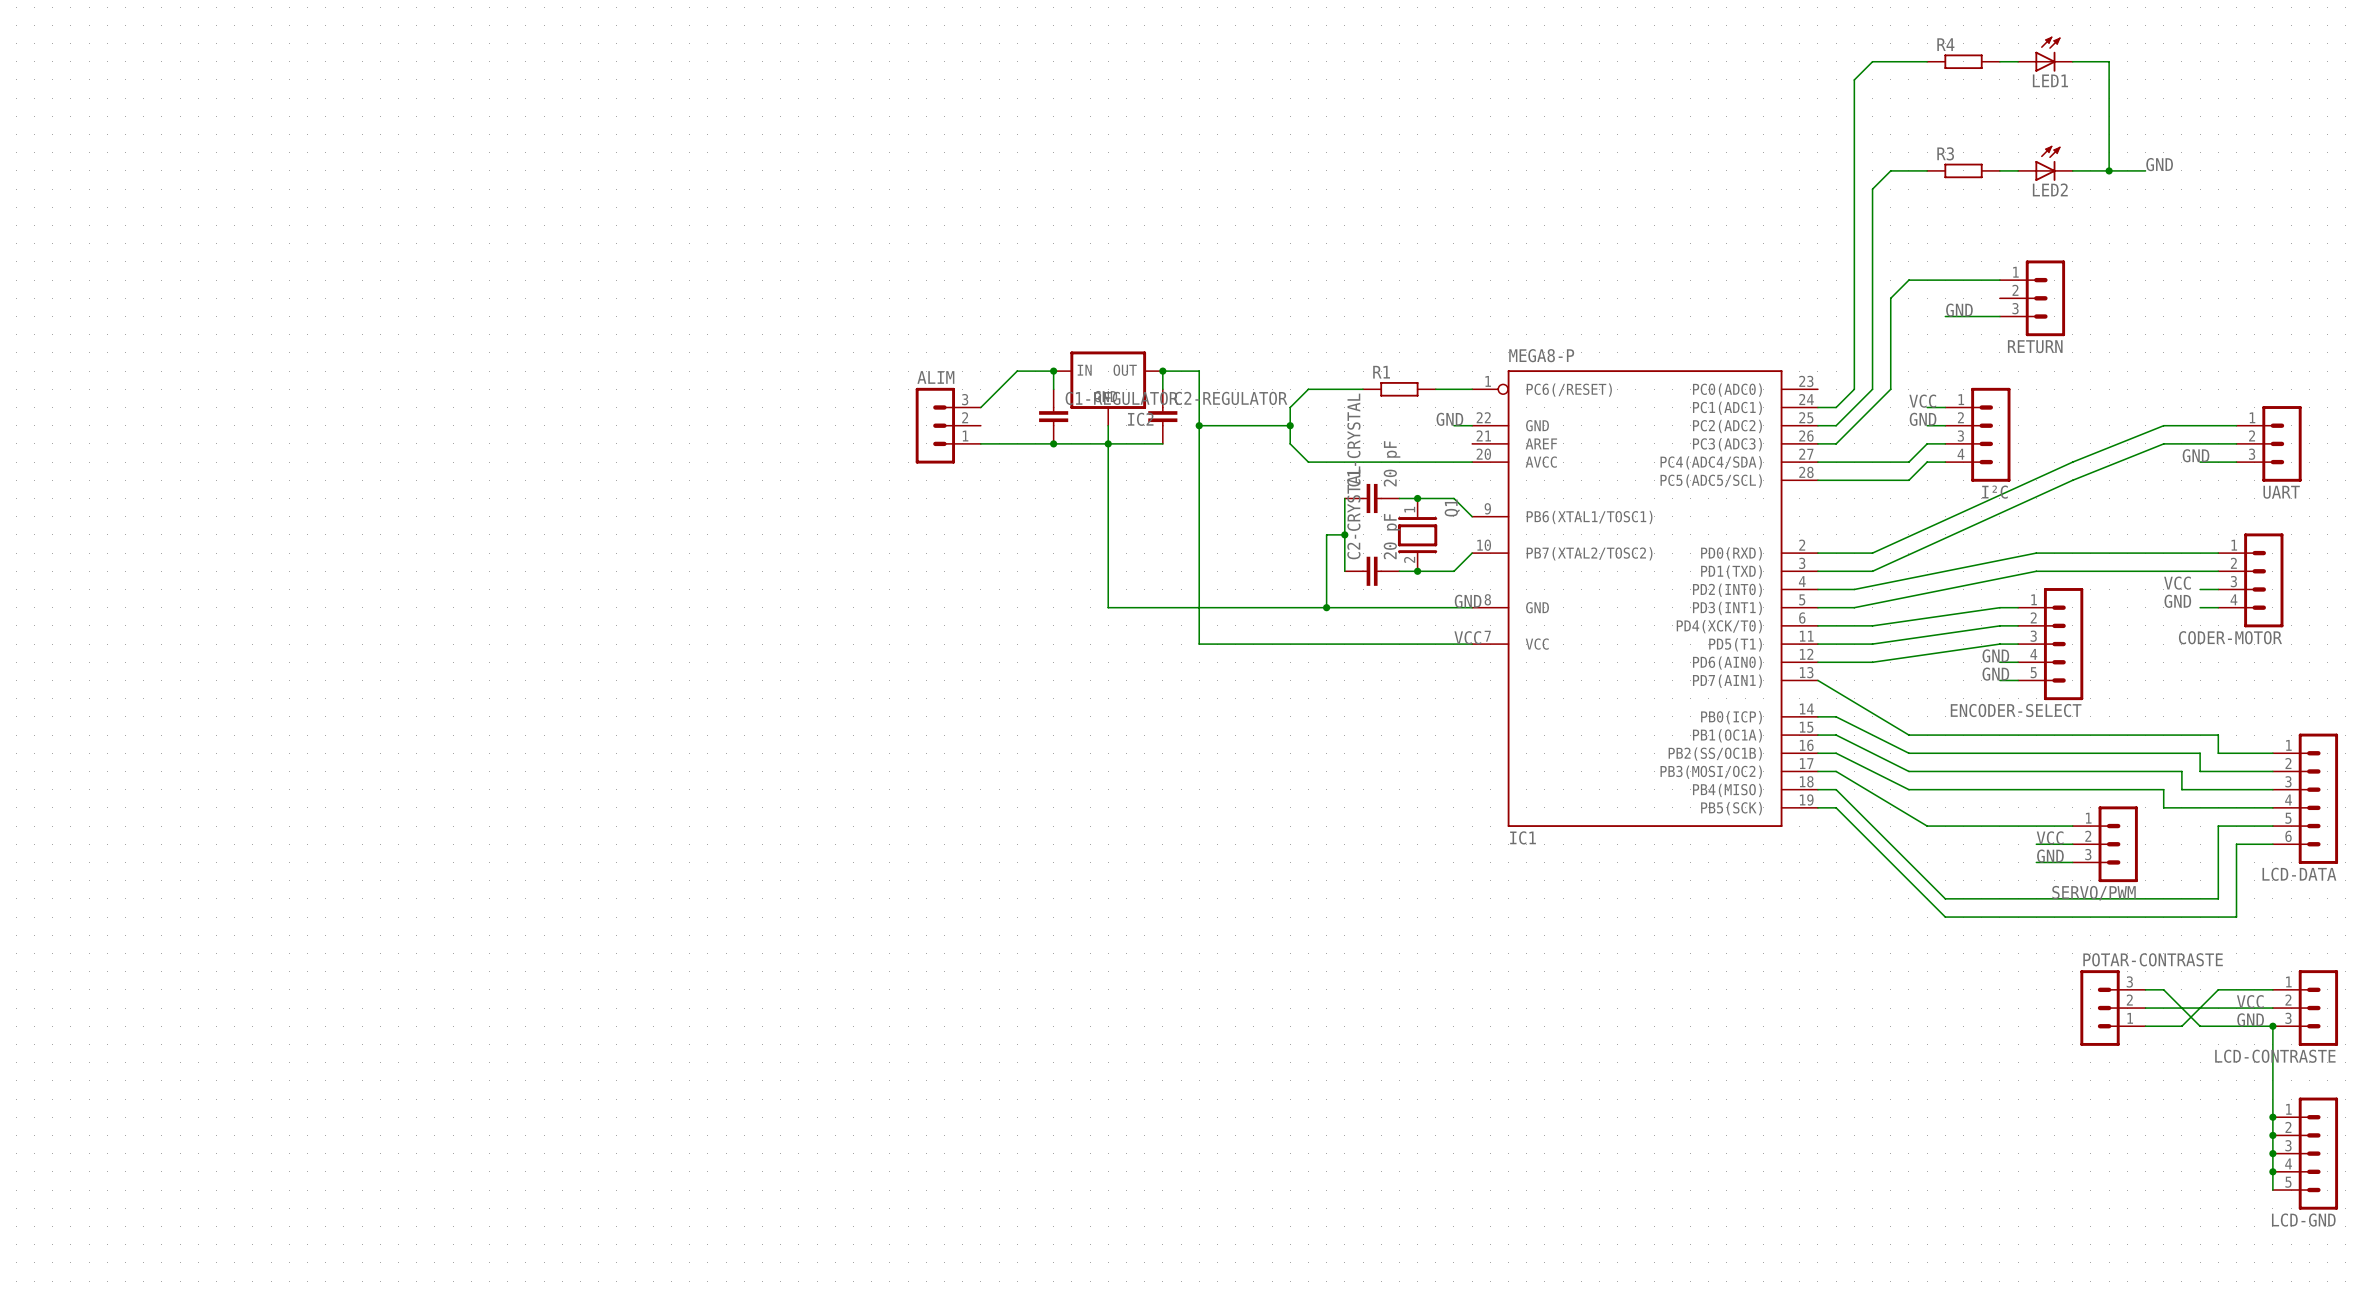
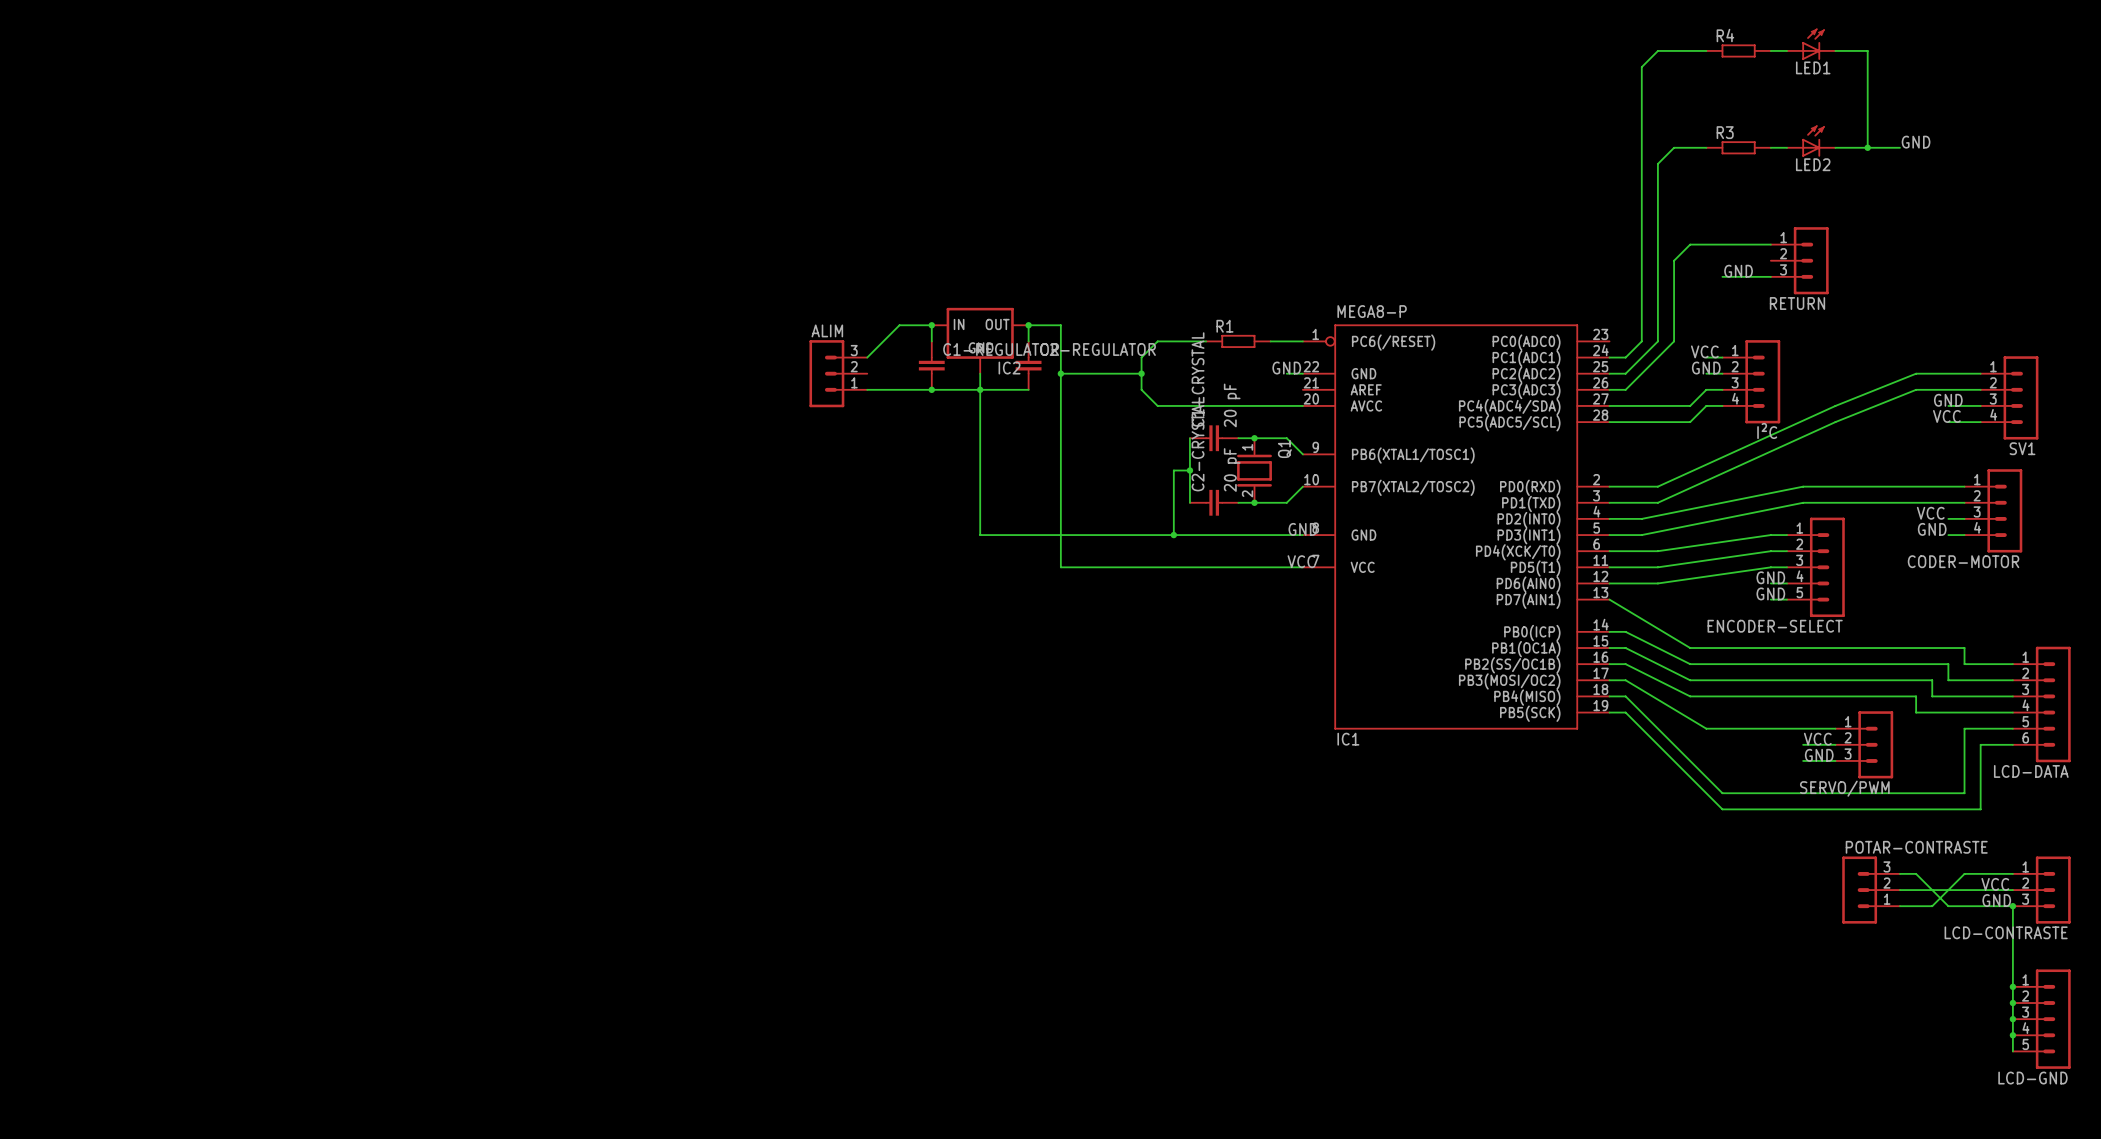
UART: (2269, 443) -> none
SV1: none -> (2009, 397)
label: none -> VCC (1946, 416)
wire: none -> (1948, 422) (1980, 422)

